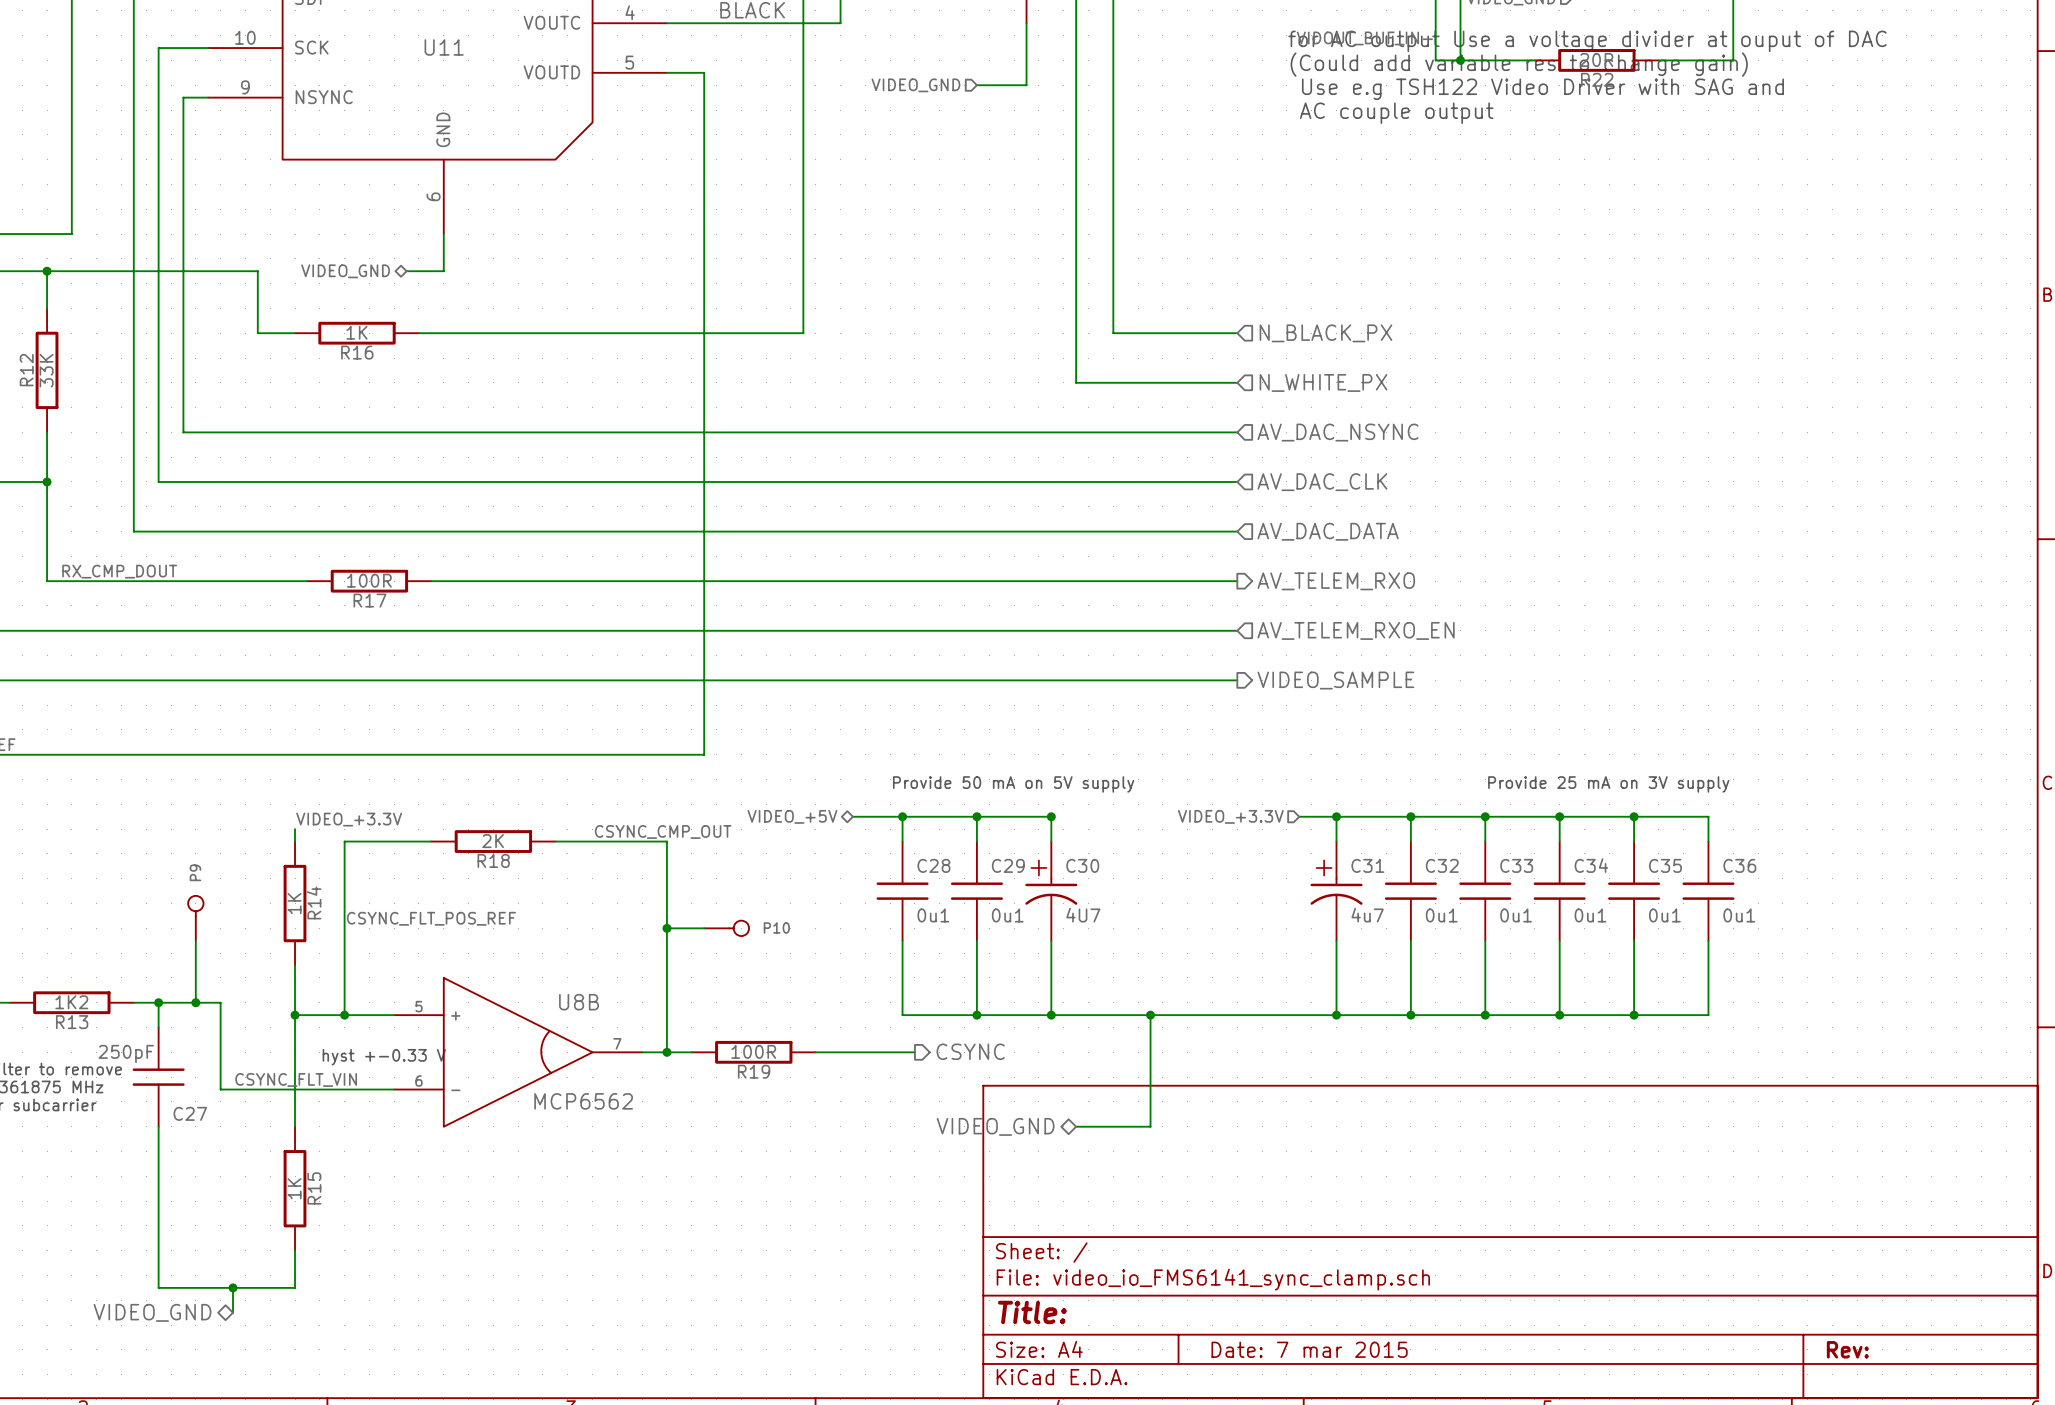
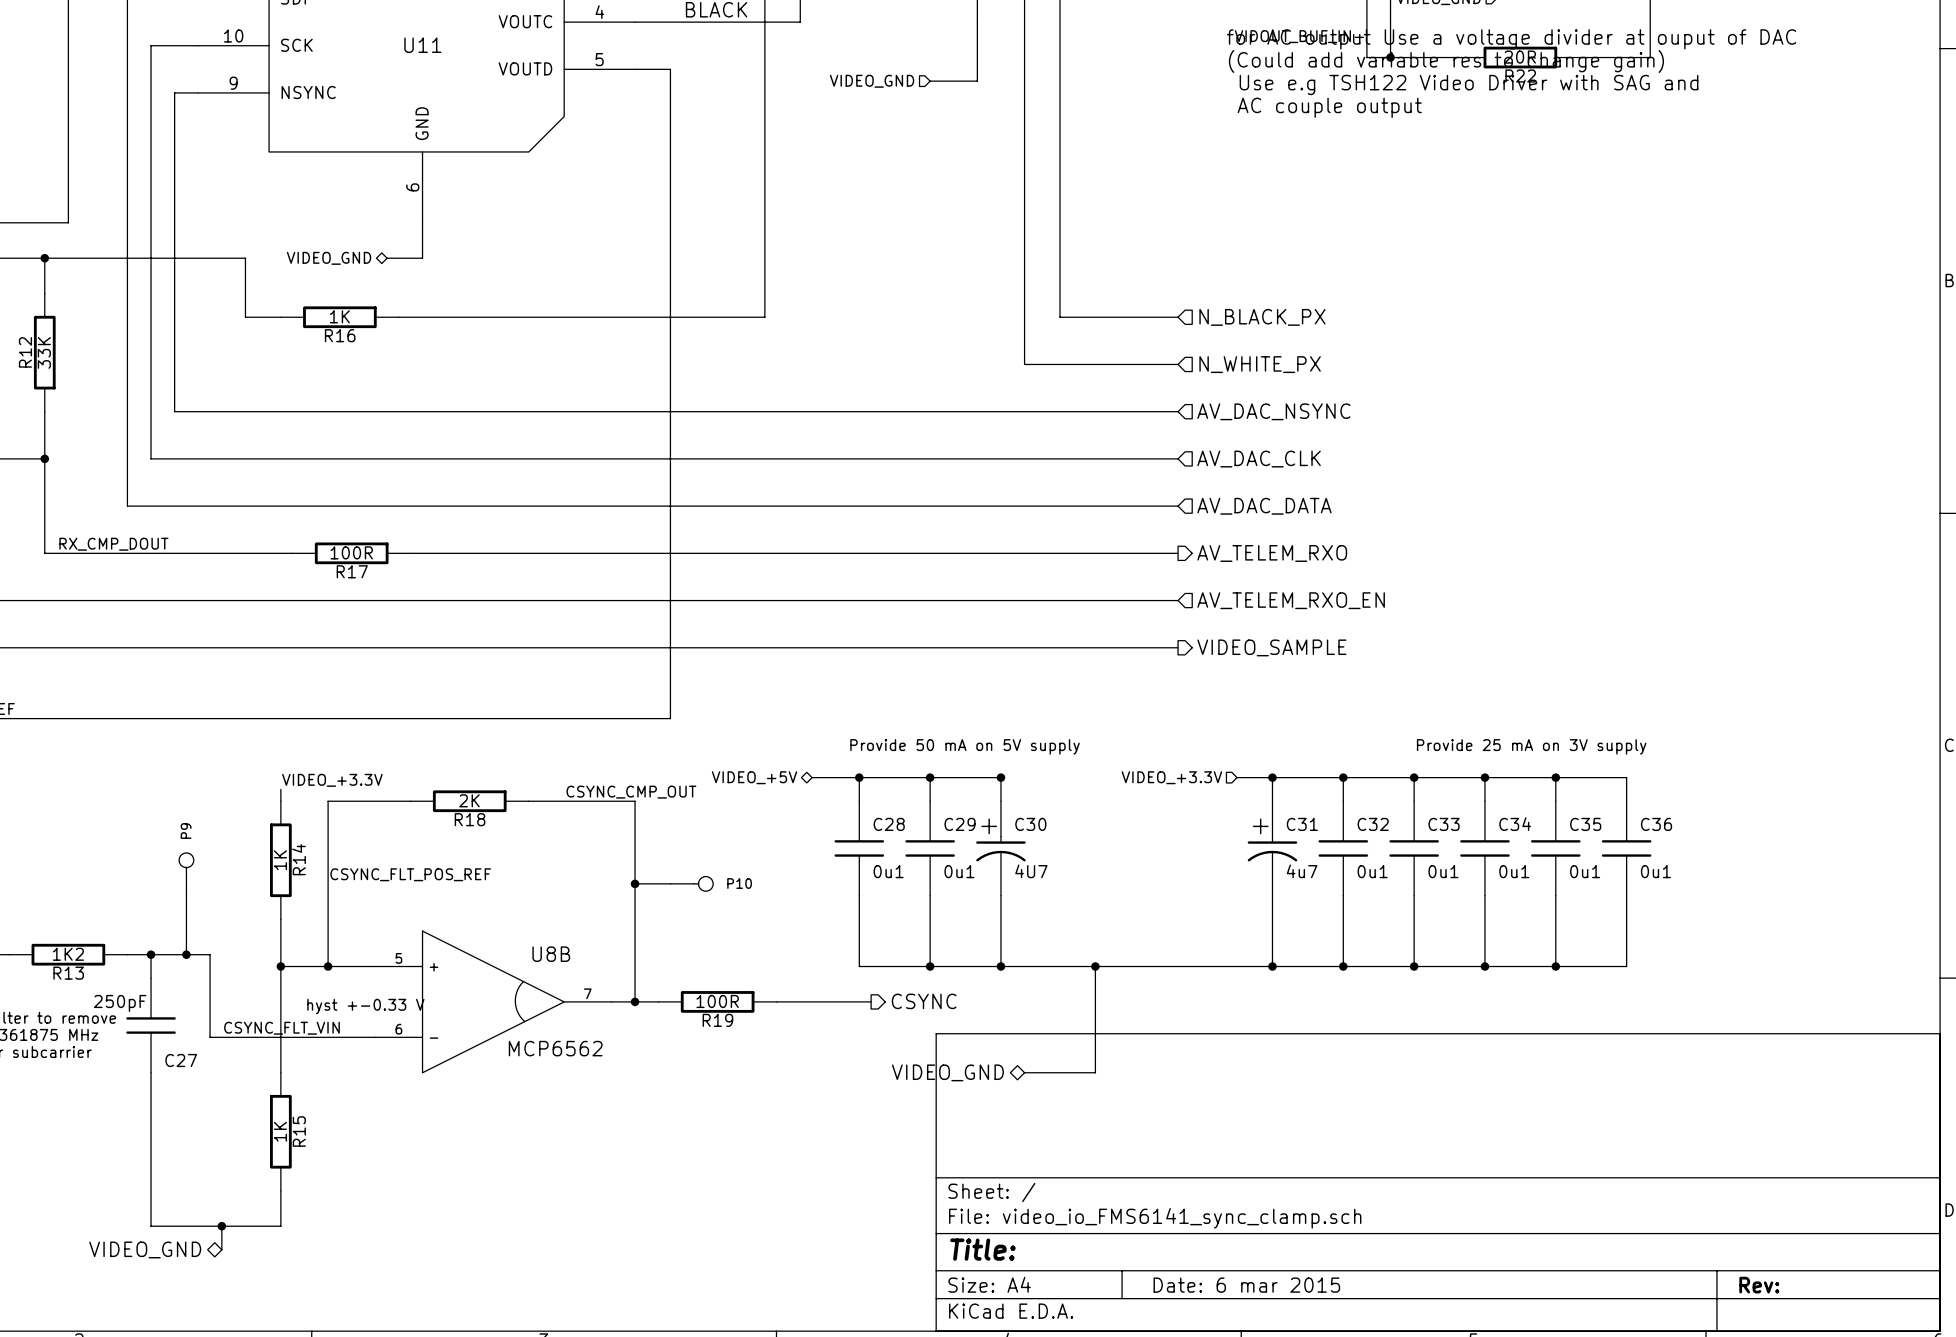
title block: Date: 7 mar 2015 (1309, 1349) -> Date: 6 mar 2015 (1246, 1285)

